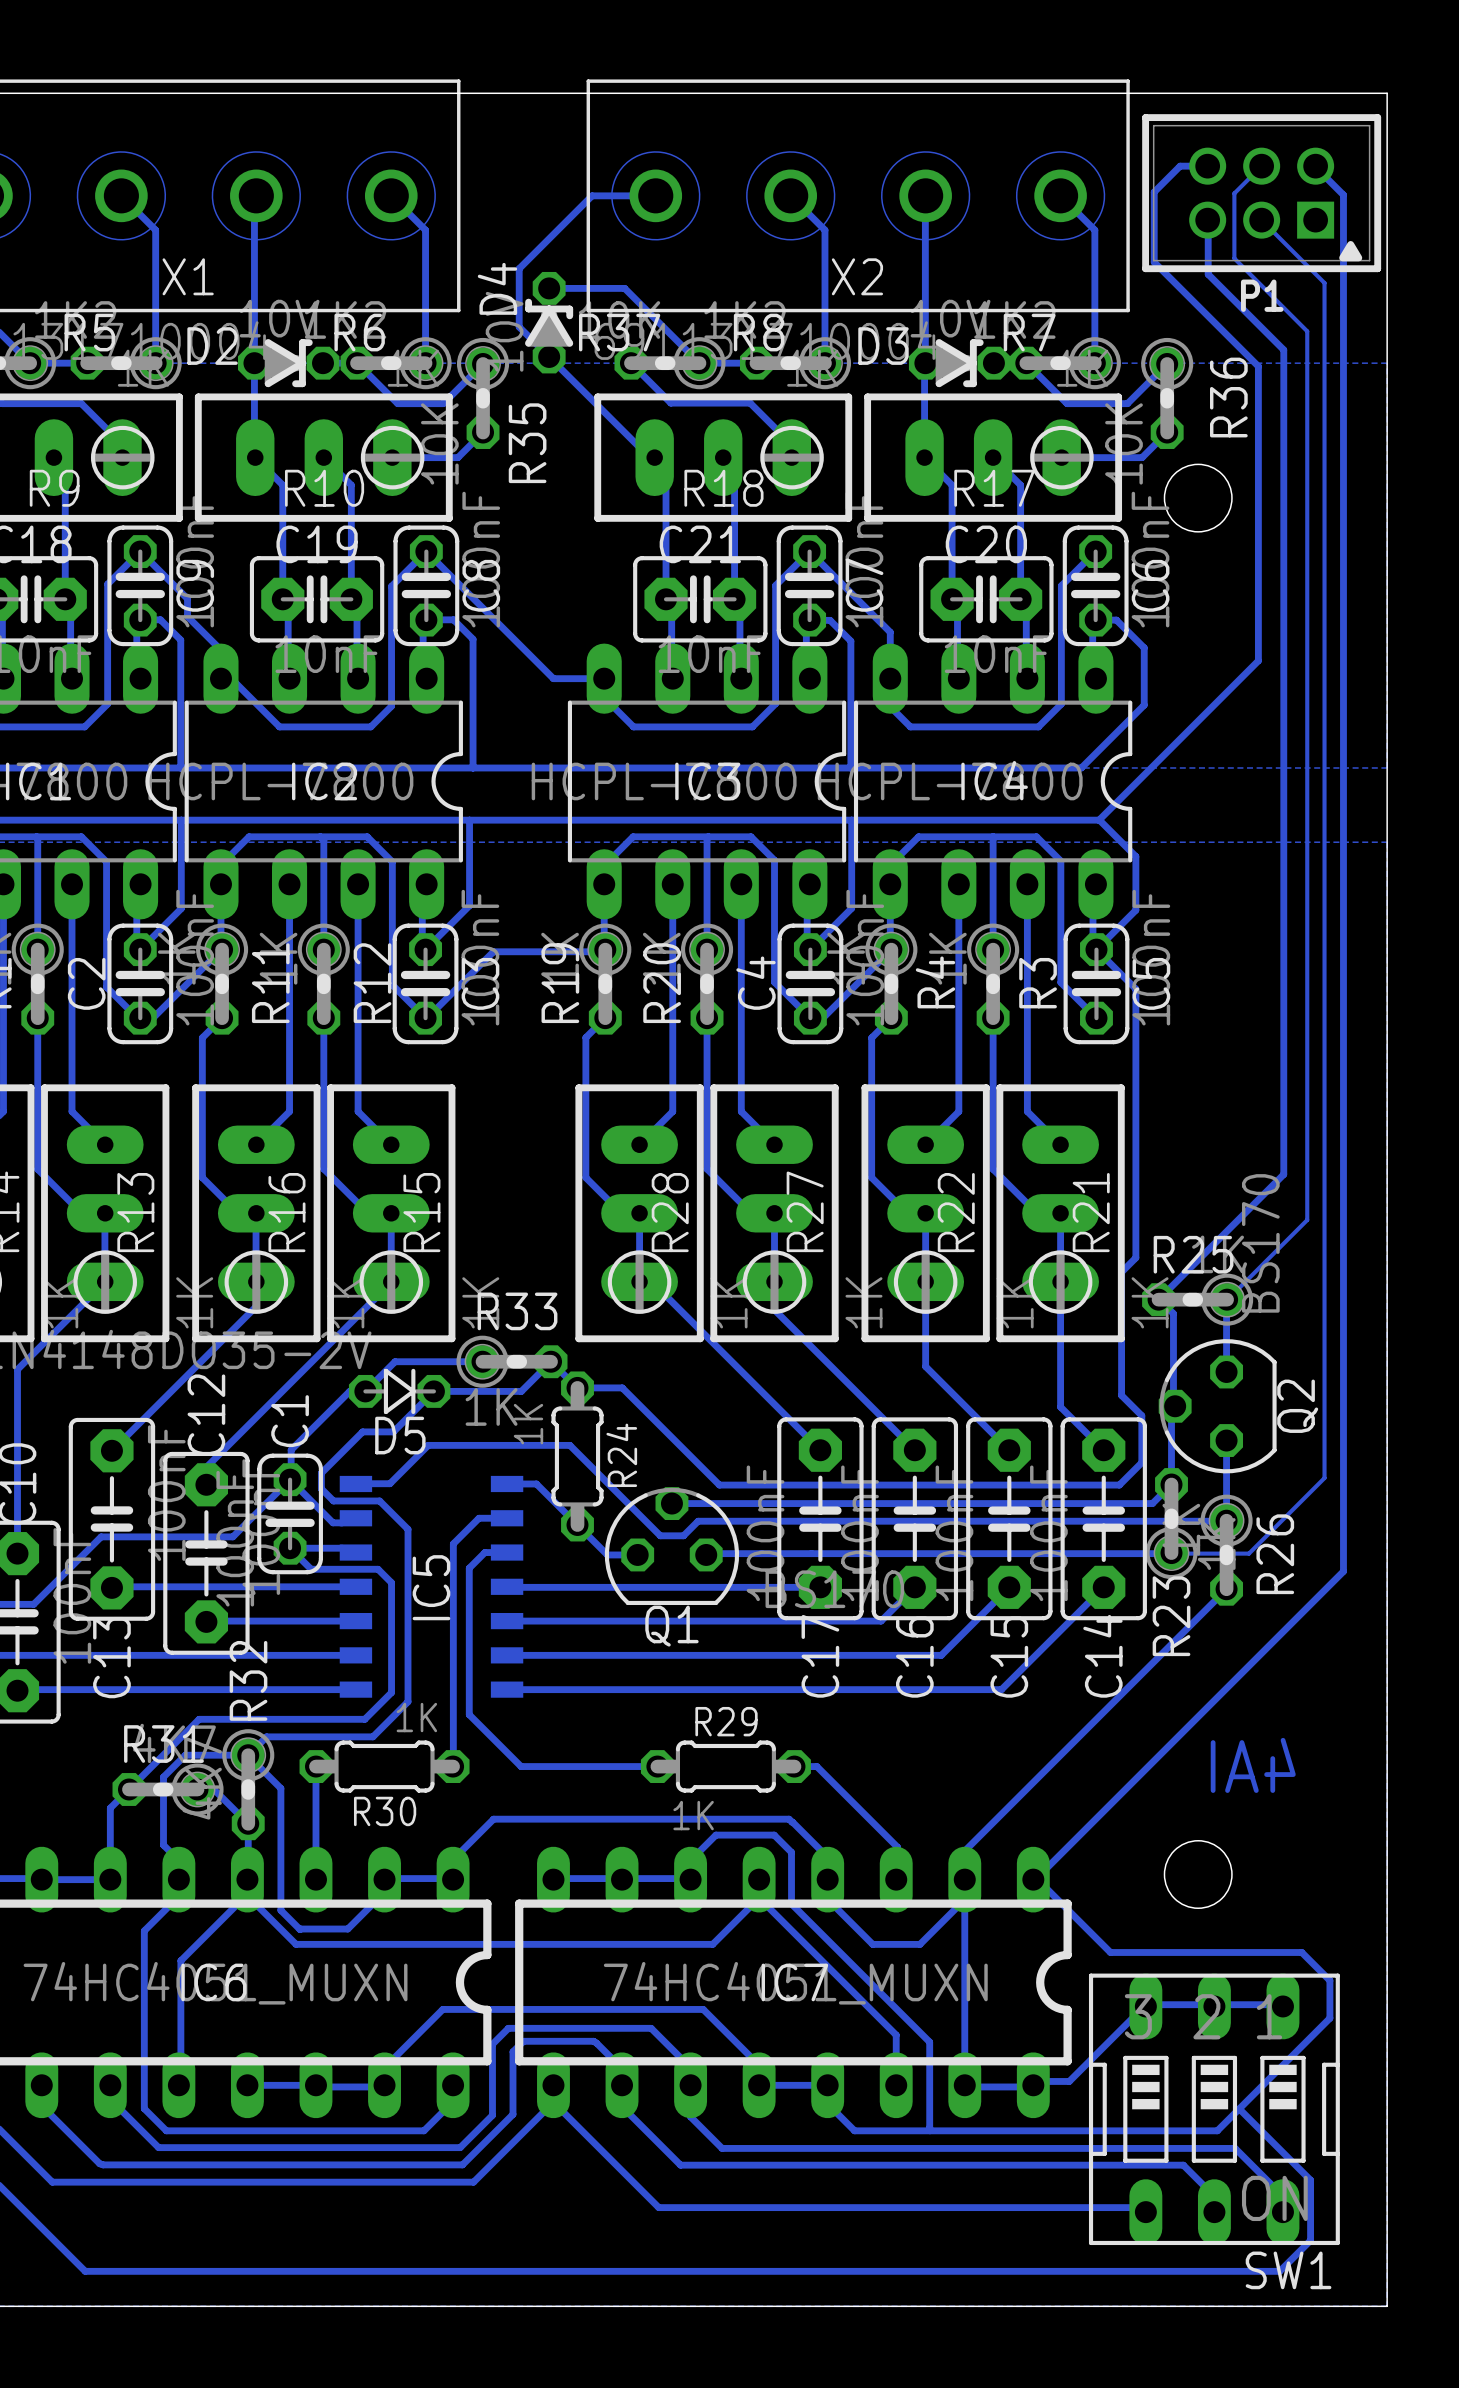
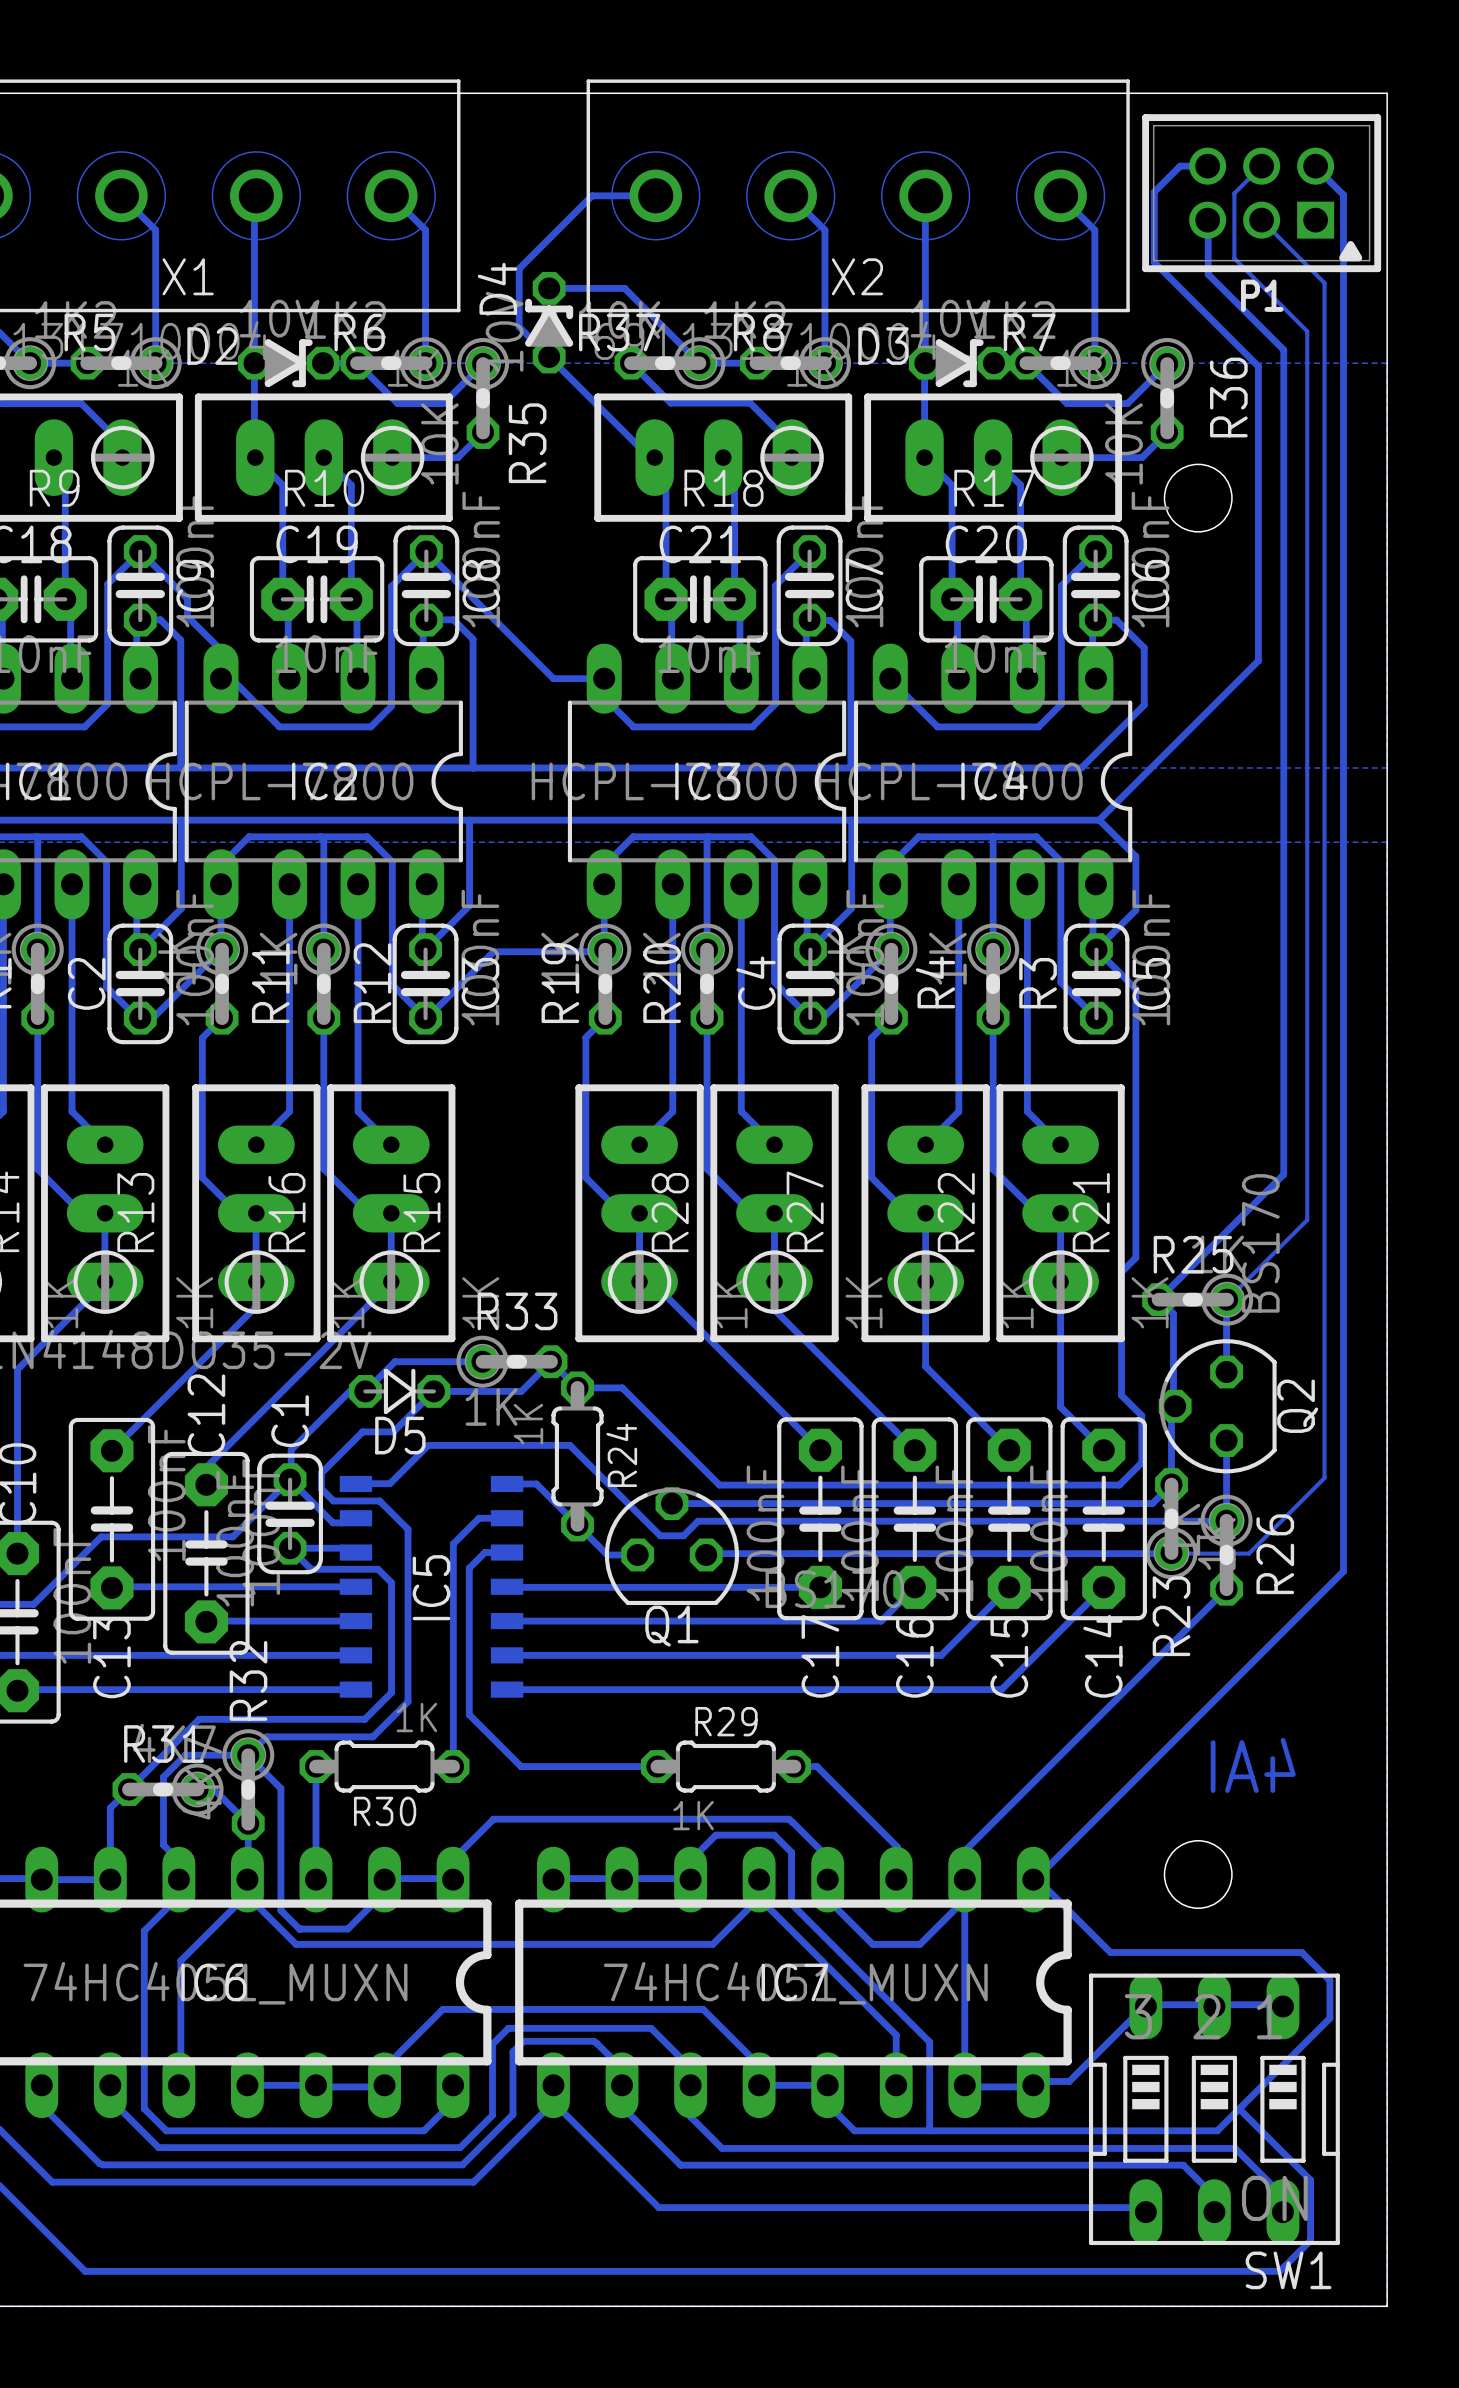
bottom track: (810, 552) (890, 632) (890, 706) (910, 726) (937, 726) -> (893, 683) (937, 726)

